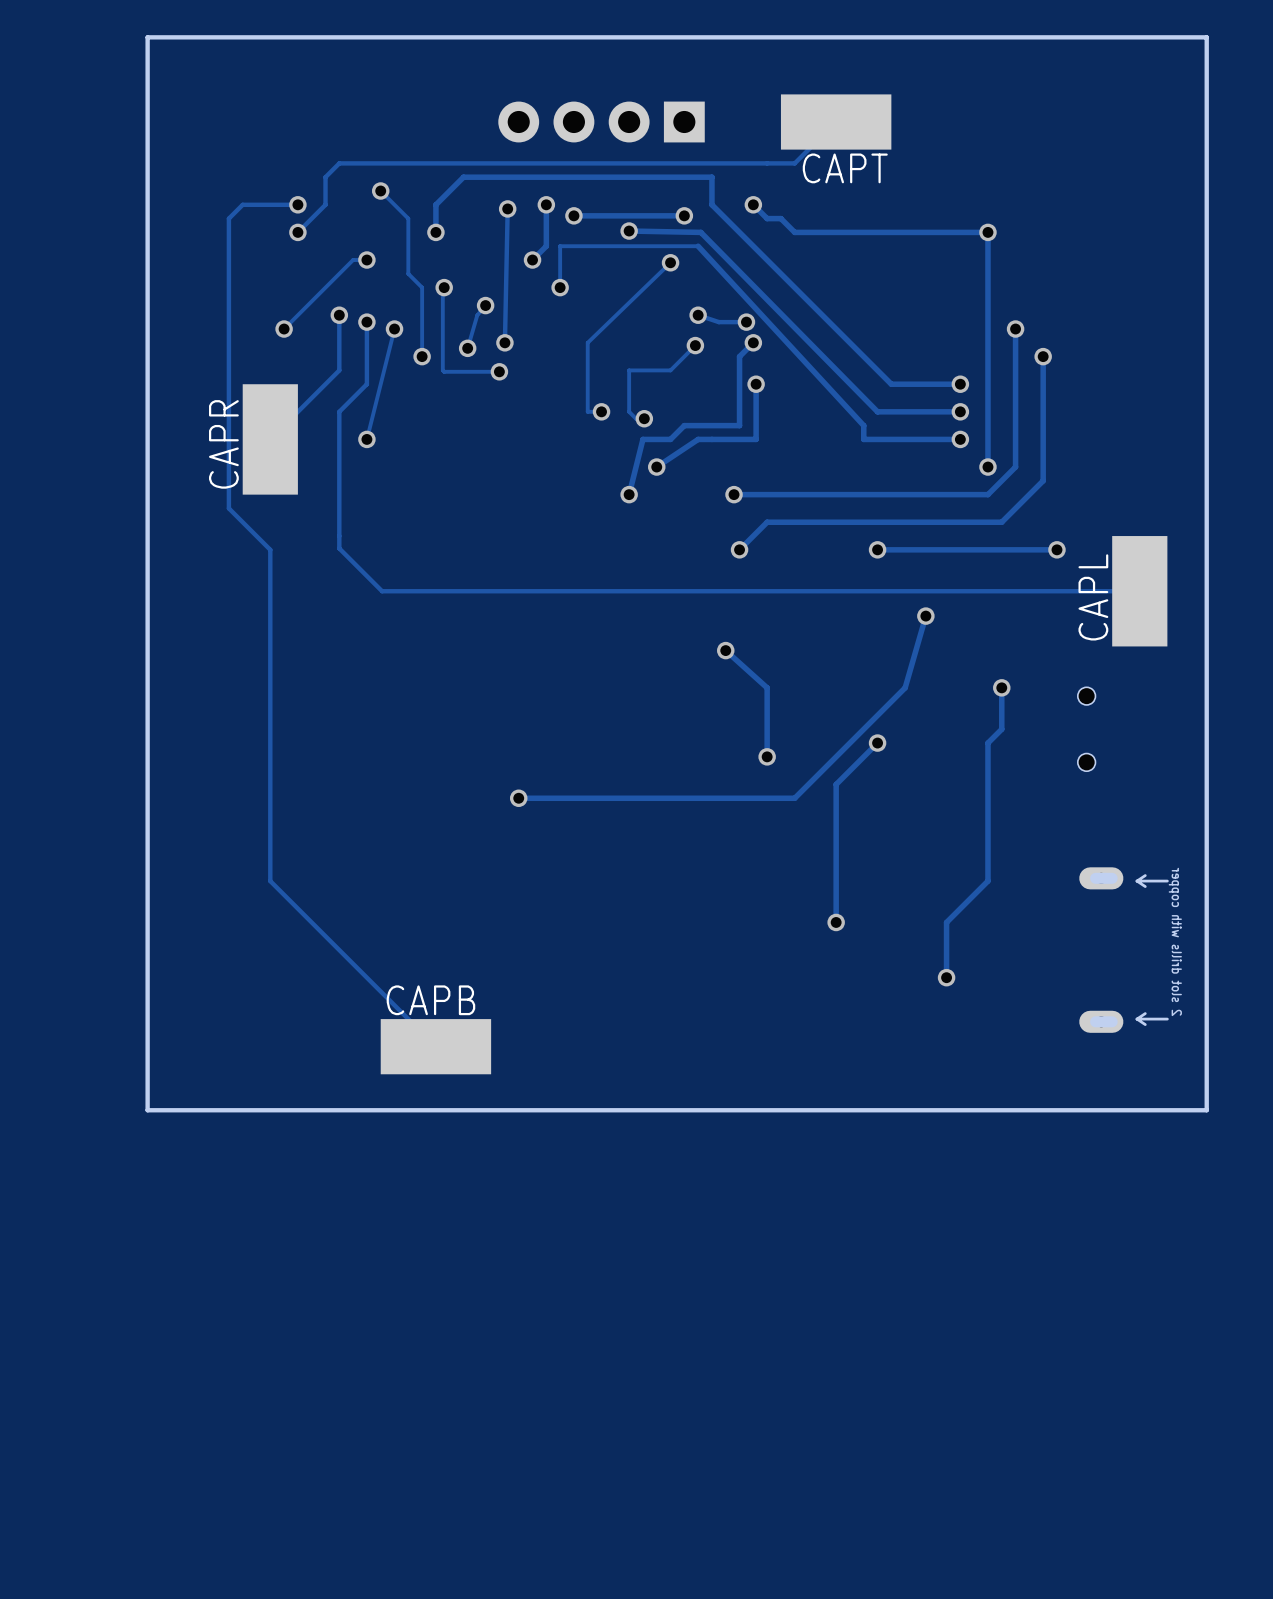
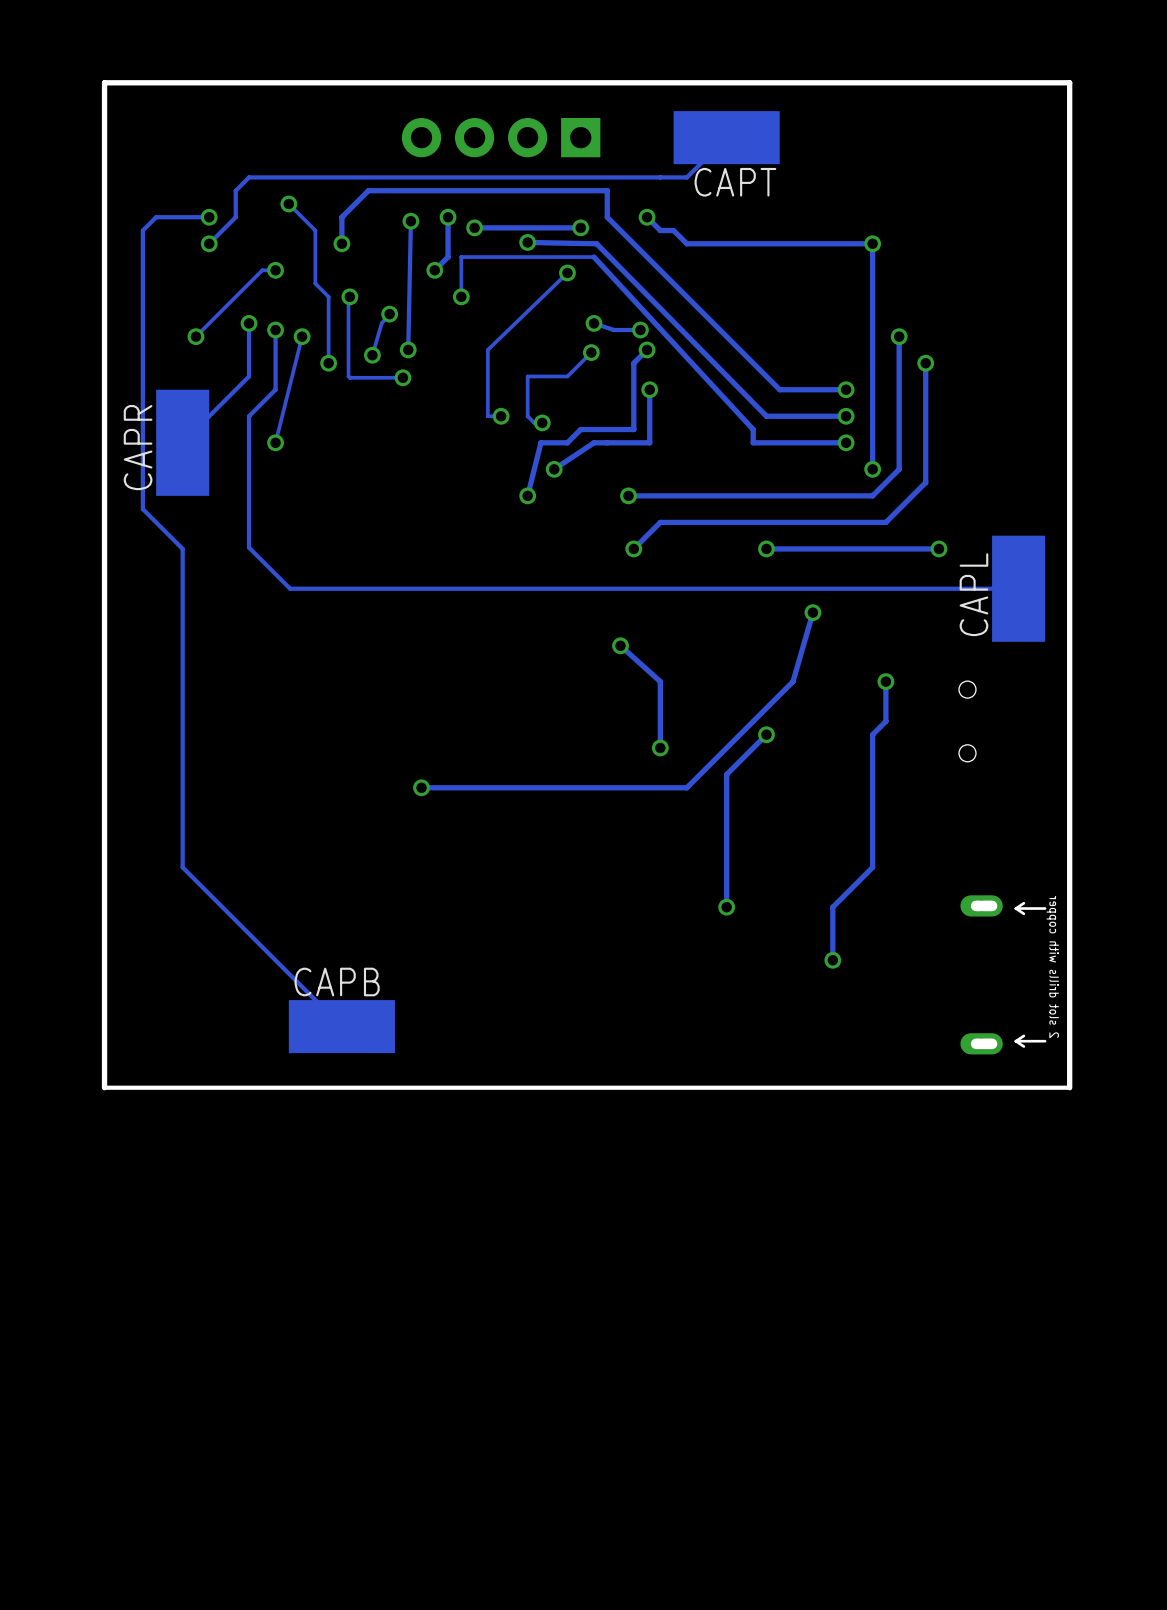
part position: (1124, 950) -> (1003, 974)
board edge: (1192, 1110) (1206, 1110) (1206, 37) (147, 37) (147, 1110) (189, 1110) -> (1069, 1087) (1069, 82) (104, 82) (104, 1087)

